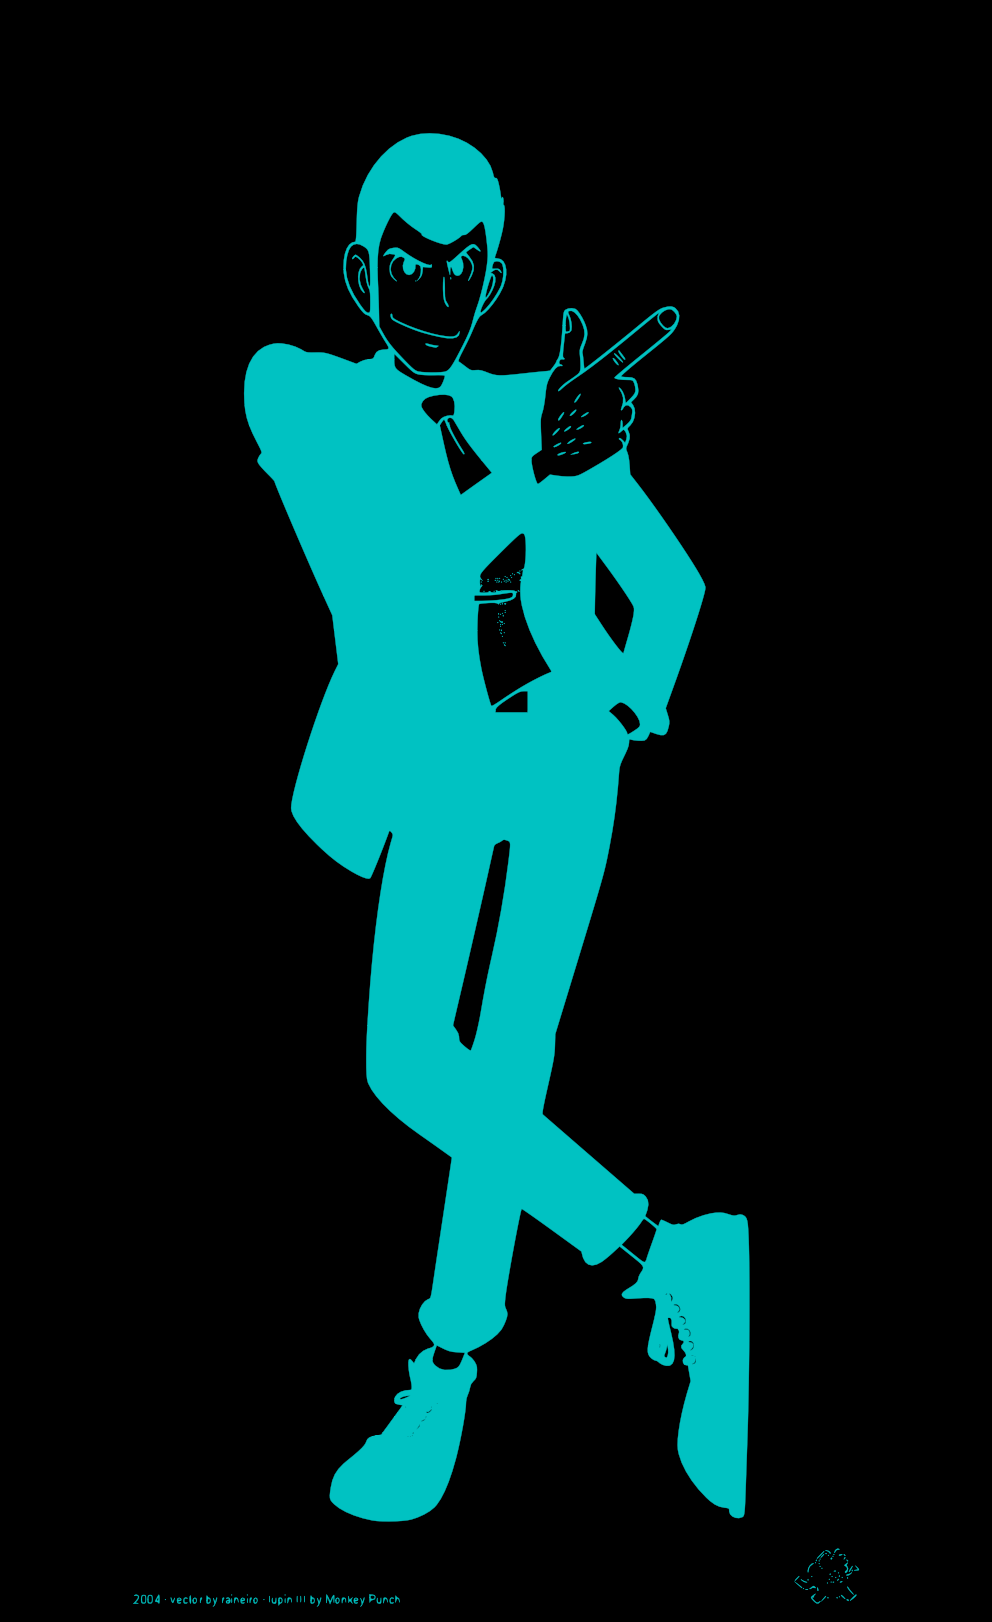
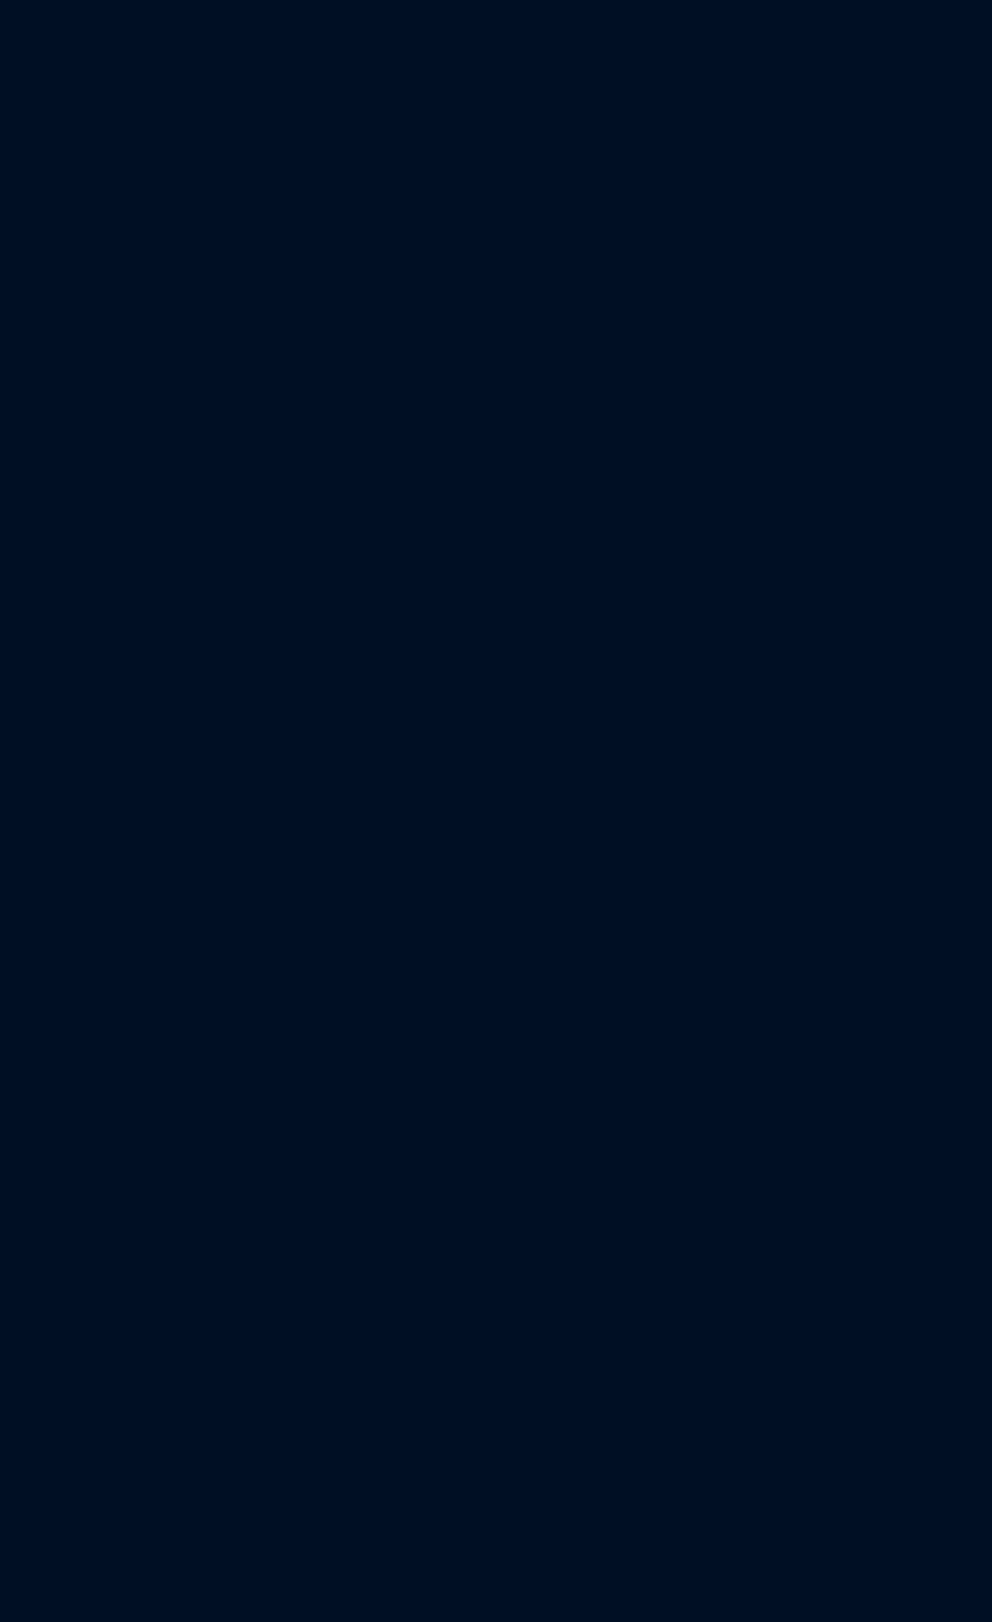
drawing: [133, 133, 860, 1607] -> none

